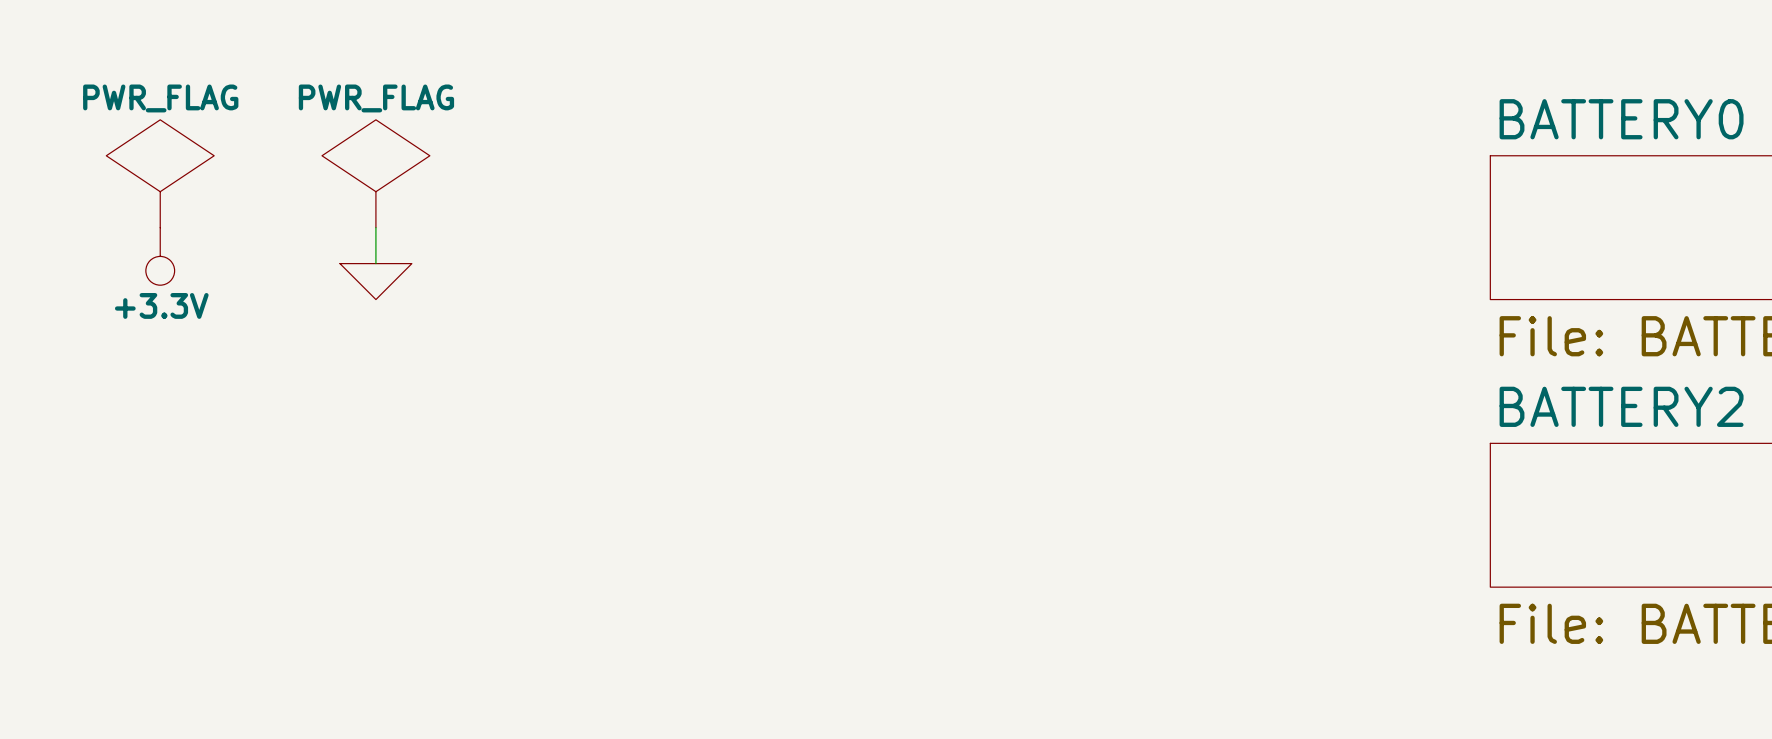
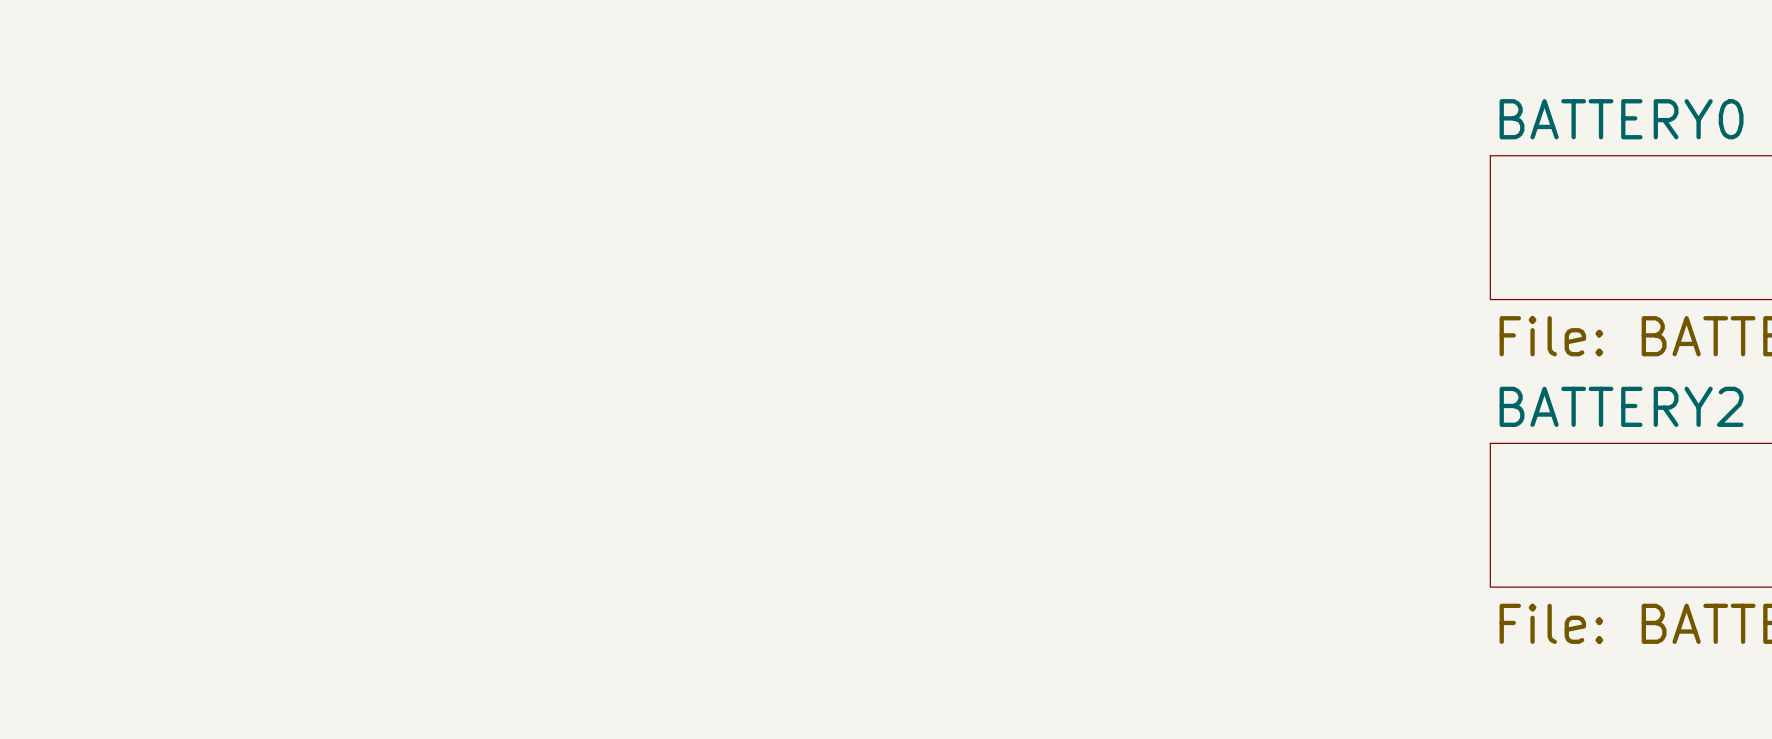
power symbol: PWR_FLAG (160, 173) -> none
power symbol: PWR_FLAG (375, 173) -> none
wire: (375, 227) (375, 263) -> none
power symbol: +3.3V (160, 256) -> none
power symbol: (375, 281) -> none

